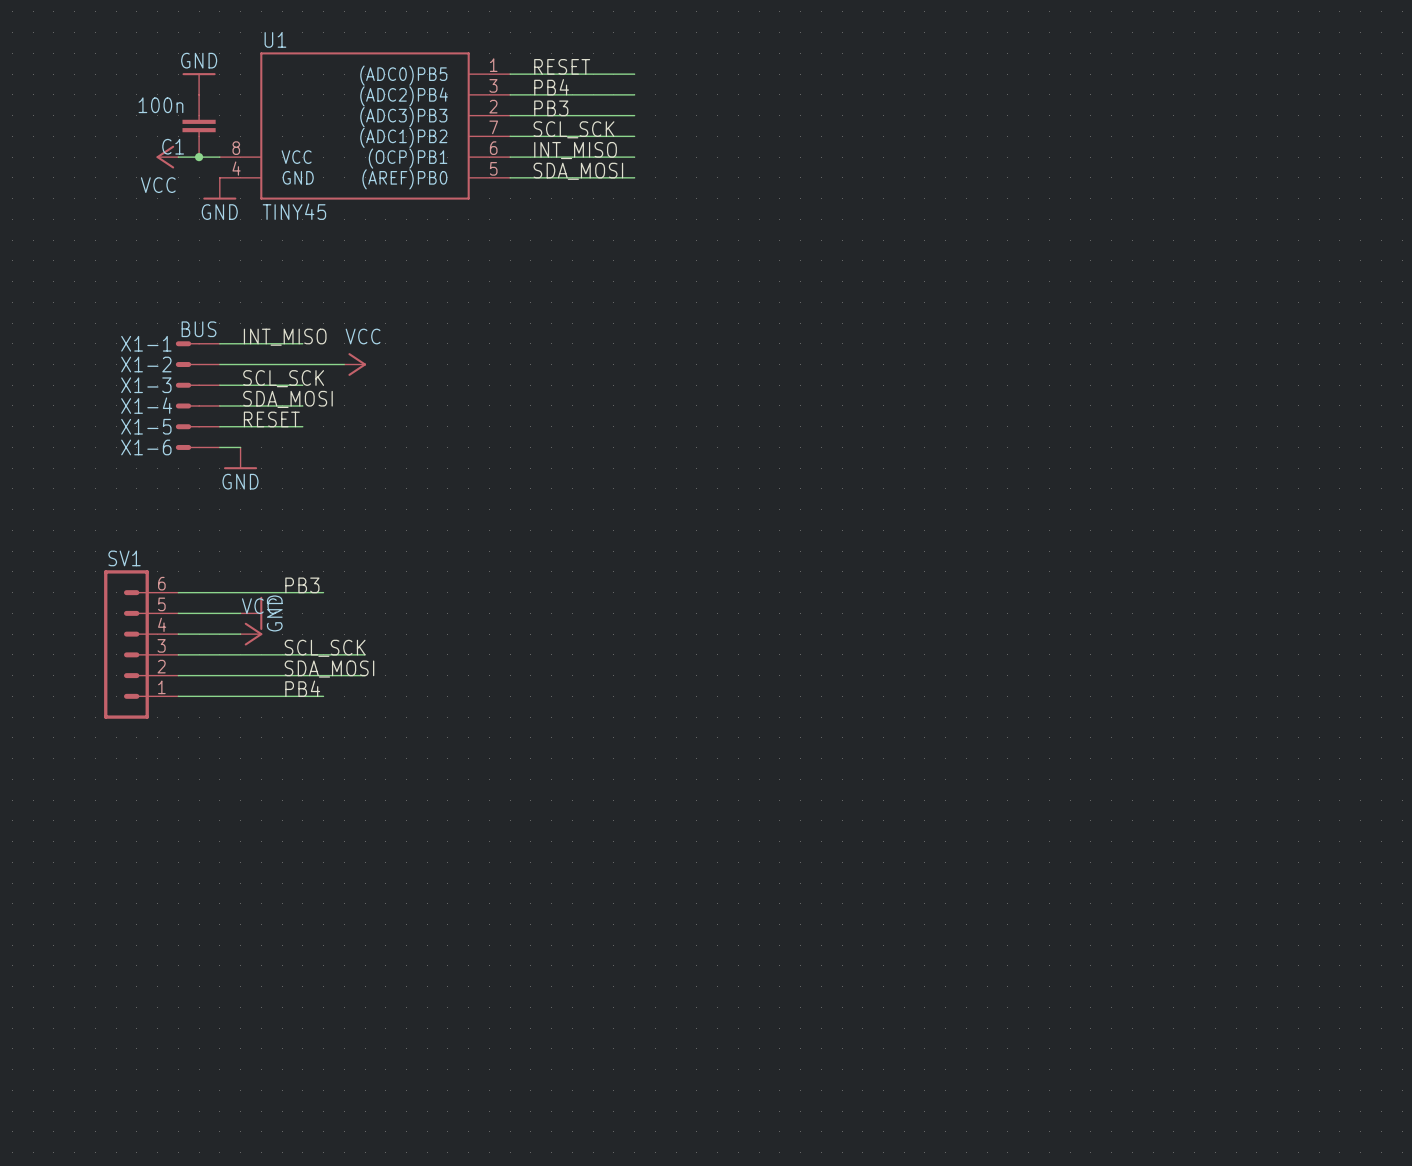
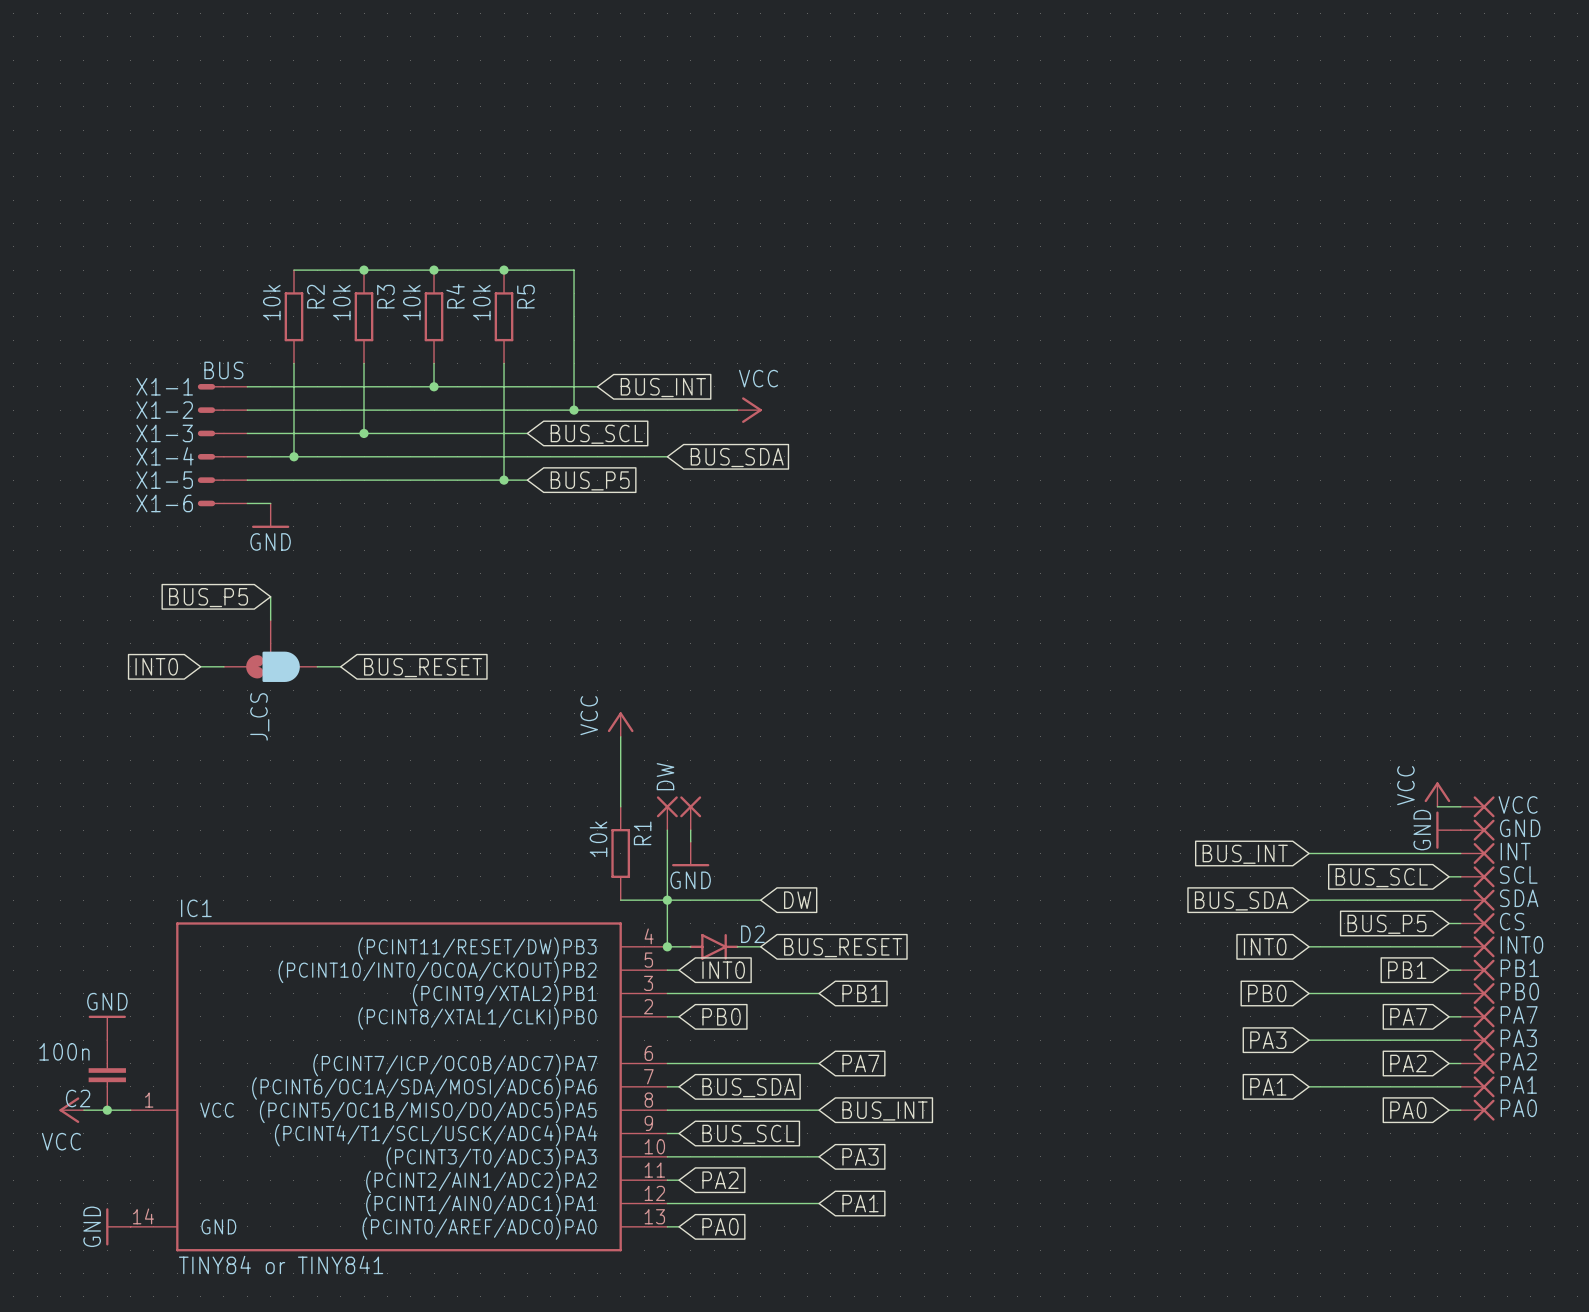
label: RESET (562, 66) -> none
wire: (510, 74) (634, 74) -> none
power symbol: GND (199, 83) -> none
label: PB4 (551, 87) -> none
wire: (510, 94) (634, 94) -> none
label: PB3 (551, 108) -> none
wire: (510, 115) (634, 115) -> none
C1: 100n (199, 125) -> none
U1: TINY45 (365, 125) -> none
label: SCL_SCK (573, 129) -> none
wire: (510, 136) (634, 136) -> none
label: INT_MISO (575, 150) -> none
power symbol: VCC (167, 157) -> none
wire: (178, 157) (219, 157) -> none
junction: (199, 157) -> none
wire: (510, 157) (634, 157) -> none
label: SDA_MOSI (578, 171) -> none
wire: (510, 177) (634, 177) -> none
power symbol: GND (219, 188) -> none
wire: none -> (293, 270) (574, 270) (574, 410)
junction: none -> (364, 270)
junction: none -> (434, 270)
junction: none -> (504, 270)
R2: none -> 10k (293, 316)
R3: none -> 10k (364, 316)
R4: none -> 10k (434, 316)
R5: none -> 10k (504, 316)
wire: none -> (293, 363) (293, 456)
wire: none -> (364, 363) (364, 433)
wire: none -> (434, 363) (434, 386)
wire: none -> (504, 363) (504, 480)
label: INT_MISO (285, 337) -> none
wire: none -> (340, 386) (597, 386)
junction: none -> (434, 386)
global label: none -> BUS_INT (663, 387)
wire: none -> (387, 410) (737, 410)
power symbol: VCC (355, 364) -> none
junction: none -> (574, 410)
power symbol: none -> VCC (749, 410)
label: SCL_SCK (283, 378) -> none
wire: none -> (340, 433) (527, 433)
junction: none -> (364, 433)
global label: none -> BUS_SCL (596, 434)
label: SDA_MOSI (287, 399) -> none
junction: none -> (293, 456)
wire: none -> (340, 456) (667, 456)
global label: none -> BUS_SDA (737, 457)
label: RESET (271, 419) -> none
wire: none -> (340, 480) (527, 480)
junction: none -> (504, 480)
global label: none -> BUS_P5 (590, 480)
wire: none -> (270, 596) (270, 620)
global label: none -> BUS_P5 (208, 597)
J_CS: none -> (270, 651)
label: PB3 (302, 585) -> none
global label: none -> INT0 (156, 666)
wire: (302, 592) (323, 592) -> none
global label: none -> BUS_RESET (423, 667)
wire: (178, 613) (240, 613) -> none
power symbol: GND (251, 613) -> none
wire: (178, 634) (240, 634) -> none
power symbol: VCC (251, 634) -> none
power symbol: none -> VCC (620, 724)
SV1: (141, 644) -> none
label: SCL_SCK (325, 648) -> none
wire: (178, 654) (365, 654) -> none
wire: none -> (620, 736) (620, 806)
label: SDA_MOSI (329, 669) -> none
wire: (178, 675) (365, 675) -> none
label: PB4 (302, 688) -> none
wire: (178, 696) (323, 696) -> none
power symbol: none -> VCC (1437, 794)
wire: none -> (1437, 806) (1460, 806)
VCC: none -> (1477, 806)
DW: none -> (667, 813)
part: none -> (690, 813)
wire: none -> (667, 830) (667, 946) (690, 946)
wire: none -> (690, 830) (690, 841)
power symbol: none -> GND (1448, 830)
GND: none -> (1477, 830)
R1: none -> 10k (620, 853)
wire: none -> (1309, 853) (1460, 853)
INT: none -> (1477, 853)
power symbol: none -> GND (690, 854)
global label: none -> BUS_INT (1245, 854)
wire: none -> (1449, 876) (1460, 876)
SCL: none -> (1477, 876)
global label: none -> BUS_SCL (1381, 877)
wire: none -> (620, 900) (760, 900)
junction: none -> (667, 900)
global label: none -> DW (797, 900)
global label: none -> BUS_SDA (1241, 900)
wire: none -> (1309, 900) (1460, 900)
SDA: none -> (1477, 900)
wire: none -> (1449, 923) (1460, 923)
CS: none -> (1477, 923)
global label: none -> BUS_P5 (1386, 924)
junction: none -> (667, 946)
D2: none -> (714, 946)
wire: none -> (737, 946) (760, 946)
global label: none -> INT0 (1265, 946)
wire: none -> (1309, 946) (1460, 946)
INT0: none -> (1477, 946)
global label: none -> BUS_RESET (843, 947)
wire: none -> (667, 970) (679, 970)
global label: none -> INT0 (723, 970)
global label: none -> PB1 (1407, 970)
wire: none -> (1449, 970) (1460, 970)
PB1: none -> (1477, 970)
wire: none -> (667, 993) (819, 993)
global label: none -> PB1 (861, 993)
global label: none -> PB0 (1267, 993)
wire: none -> (1309, 993) (1460, 993)
PB0: none -> (1477, 993)
wire: none -> (667, 1016) (679, 1016)
global label: none -> PB0 (721, 1016)
global label: none -> PA7 (1408, 1016)
wire: none -> (1449, 1016) (1460, 1016)
PA7: none -> (1477, 1016)
power symbol: none -> GND (107, 1027)
global label: none -> PA3 (1268, 1040)
wire: none -> (1309, 1040) (1460, 1040)
PA3: none -> (1477, 1040)
wire: none -> (667, 1063) (819, 1063)
global label: none -> PA7 (860, 1063)
global label: none -> PA2 (1408, 1063)
wire: none -> (1449, 1063) (1460, 1063)
PA2: none -> (1477, 1063)
C2: none -> 100n (107, 1075)
IC1: none -> TINY84 or TINY841 (399, 1086)
wire: none -> (667, 1086) (679, 1086)
global label: none -> PA1 (1268, 1086)
wire: none -> (1309, 1086) (1460, 1086)
PA1: none -> (1477, 1086)
global label: none -> BUS_SDA (748, 1087)
power symbol: none -> VCC (71, 1110)
wire: none -> (83, 1110) (130, 1110)
junction: none -> (107, 1110)
wire: none -> (667, 1110) (819, 1110)
global label: none -> PA0 (1408, 1110)
wire: none -> (1449, 1110) (1460, 1110)
PA0: none -> (1477, 1110)
global label: none -> BUS_INT (885, 1110)
wire: none -> (667, 1133) (679, 1133)
global label: none -> BUS_SCL (748, 1134)
wire: none -> (667, 1156) (819, 1156)
global label: none -> PA3 (860, 1156)
wire: none -> (667, 1180) (679, 1180)
global label: none -> PA2 (720, 1180)
wire: none -> (667, 1203) (819, 1203)
global label: none -> PA1 (860, 1203)
power symbol: none -> GND (118, 1226)
wire: none -> (667, 1226) (679, 1226)
global label: none -> PA0 (720, 1226)

